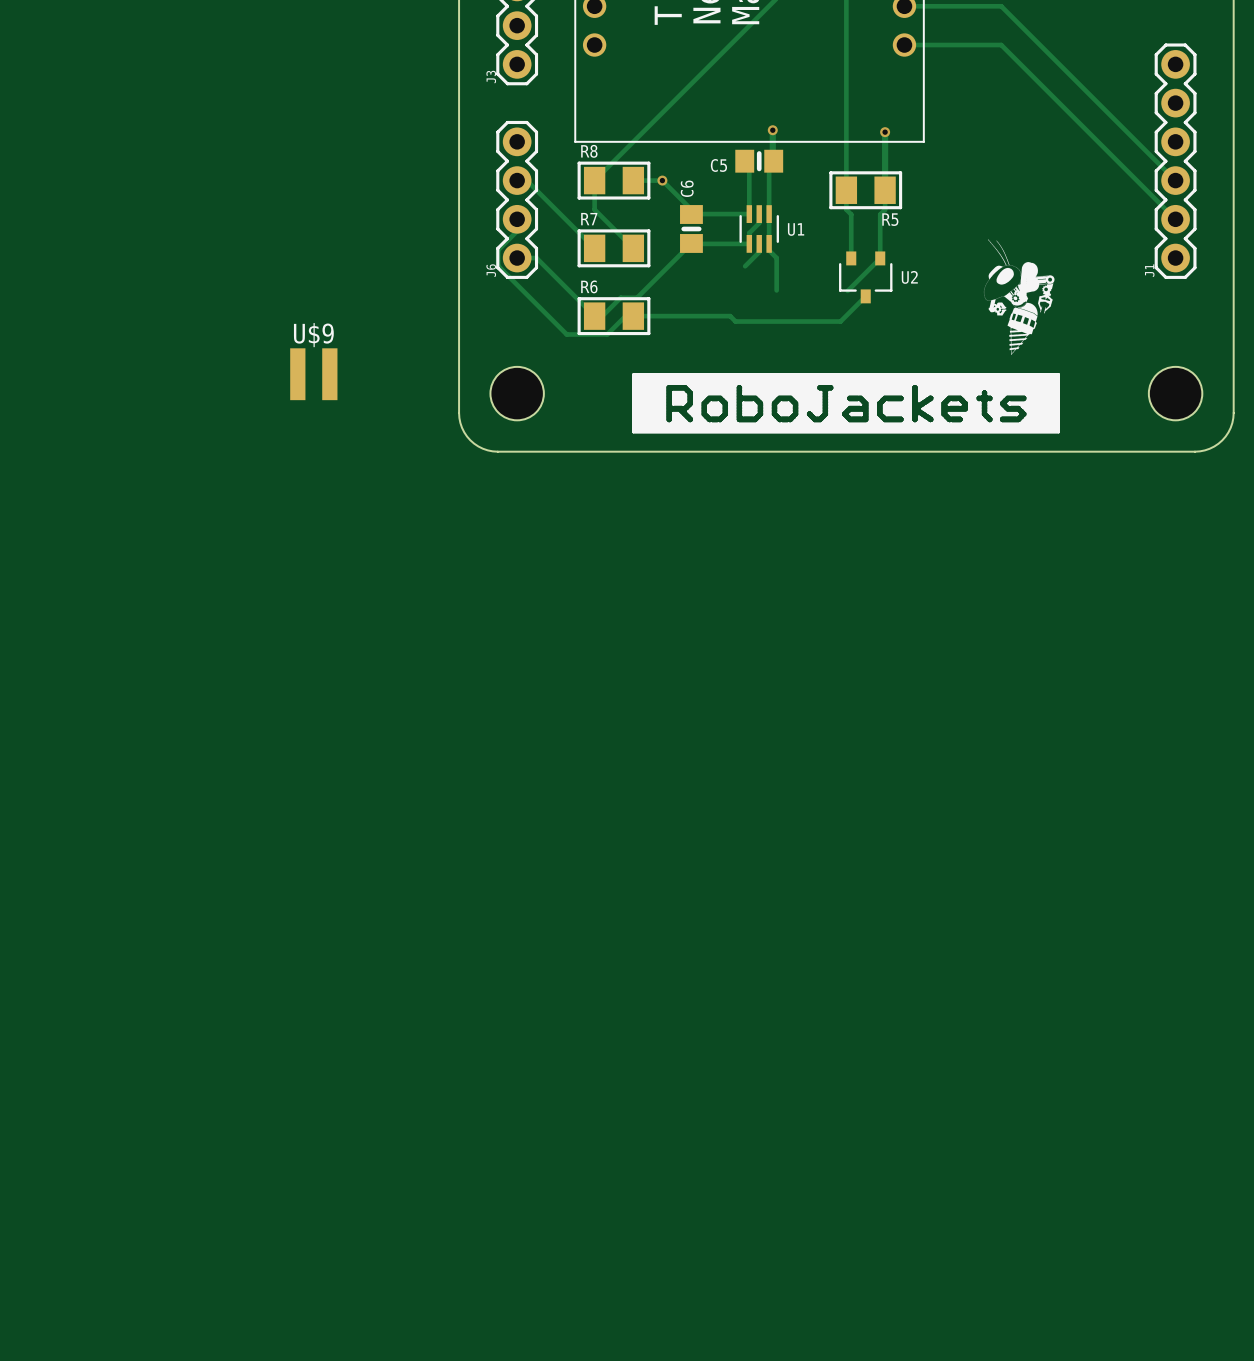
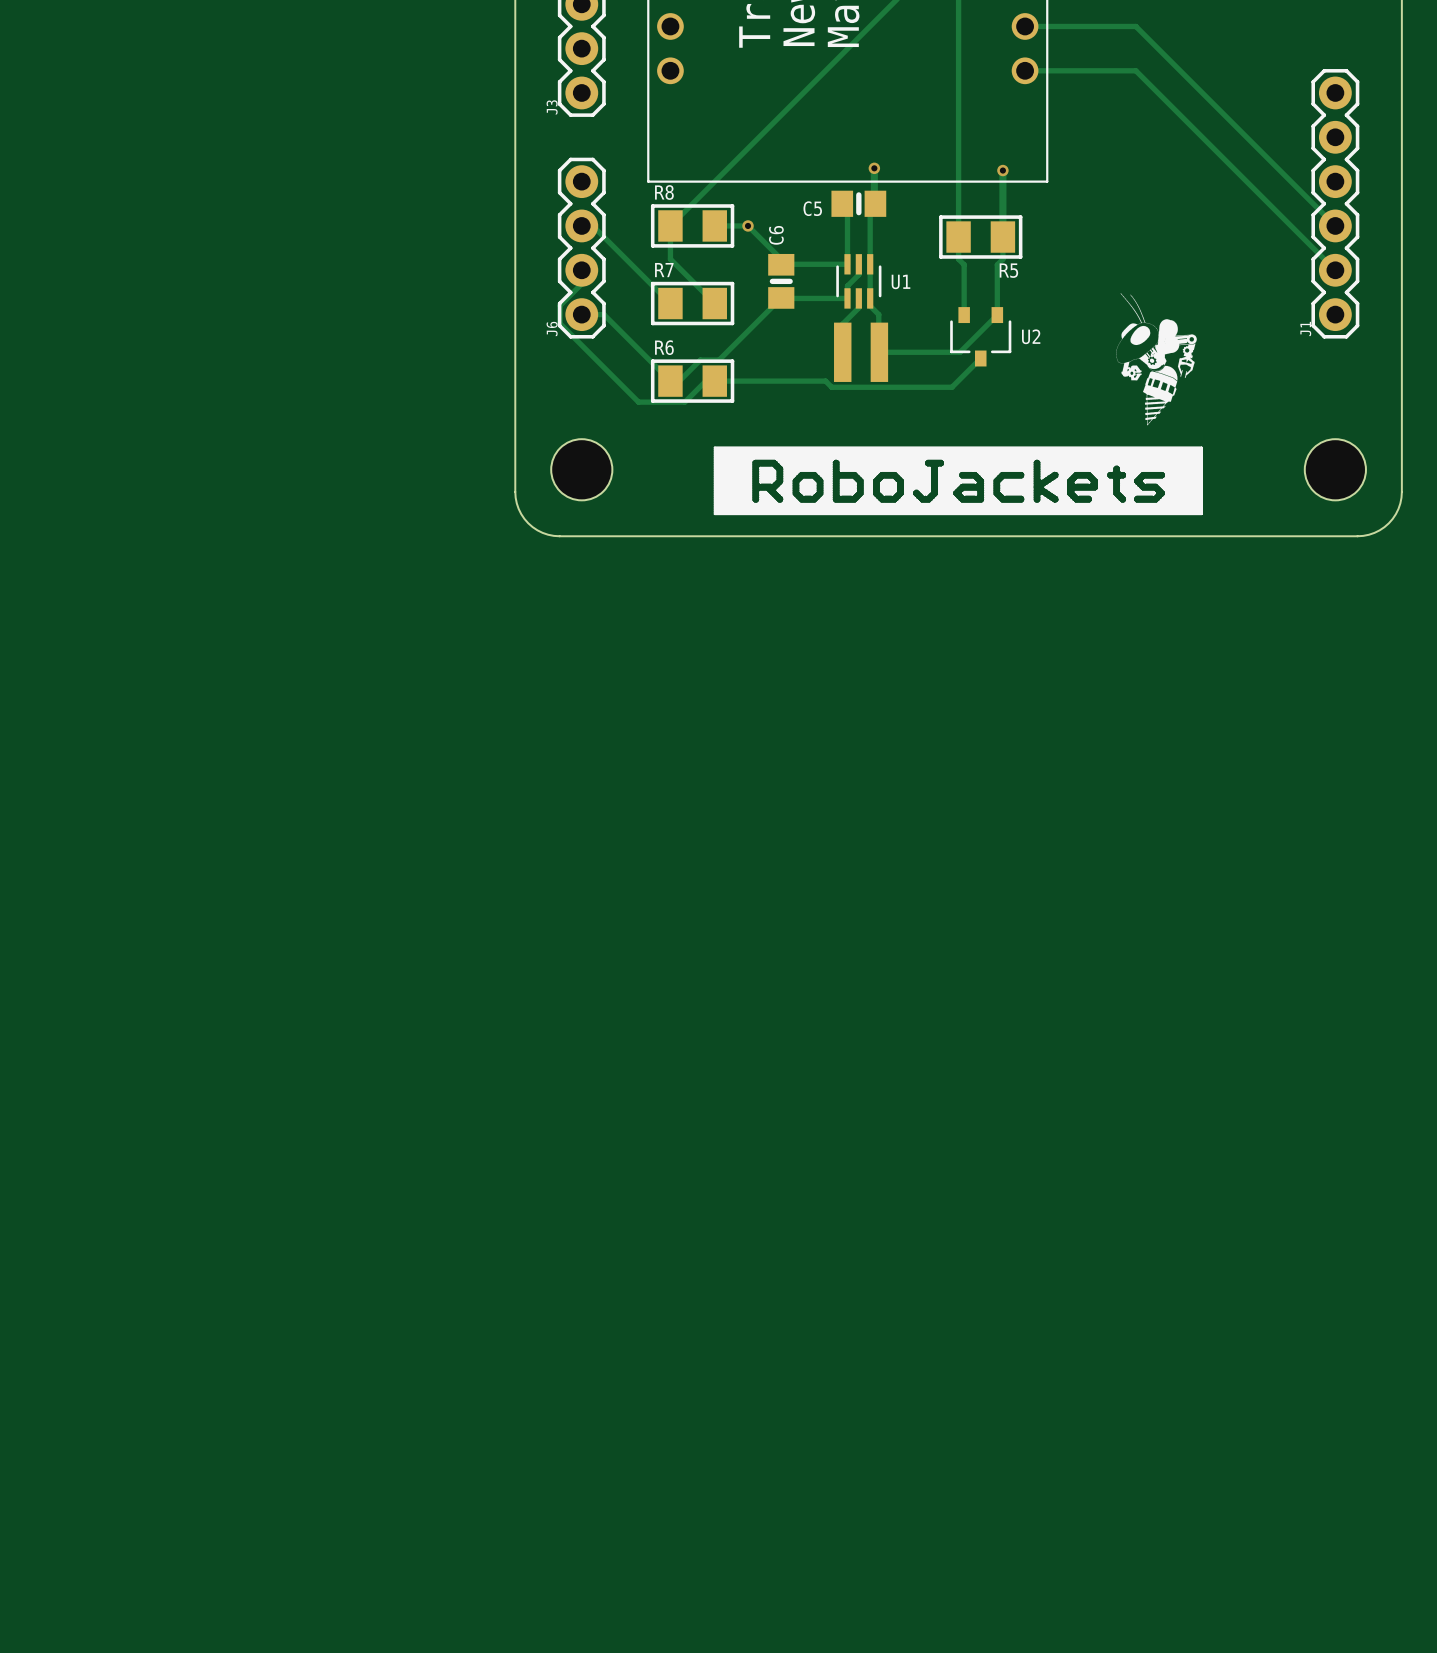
part: none -> (861, 352)
track: none -> (878, 351) (960, 352)
U$9: (313, 374) -> none

